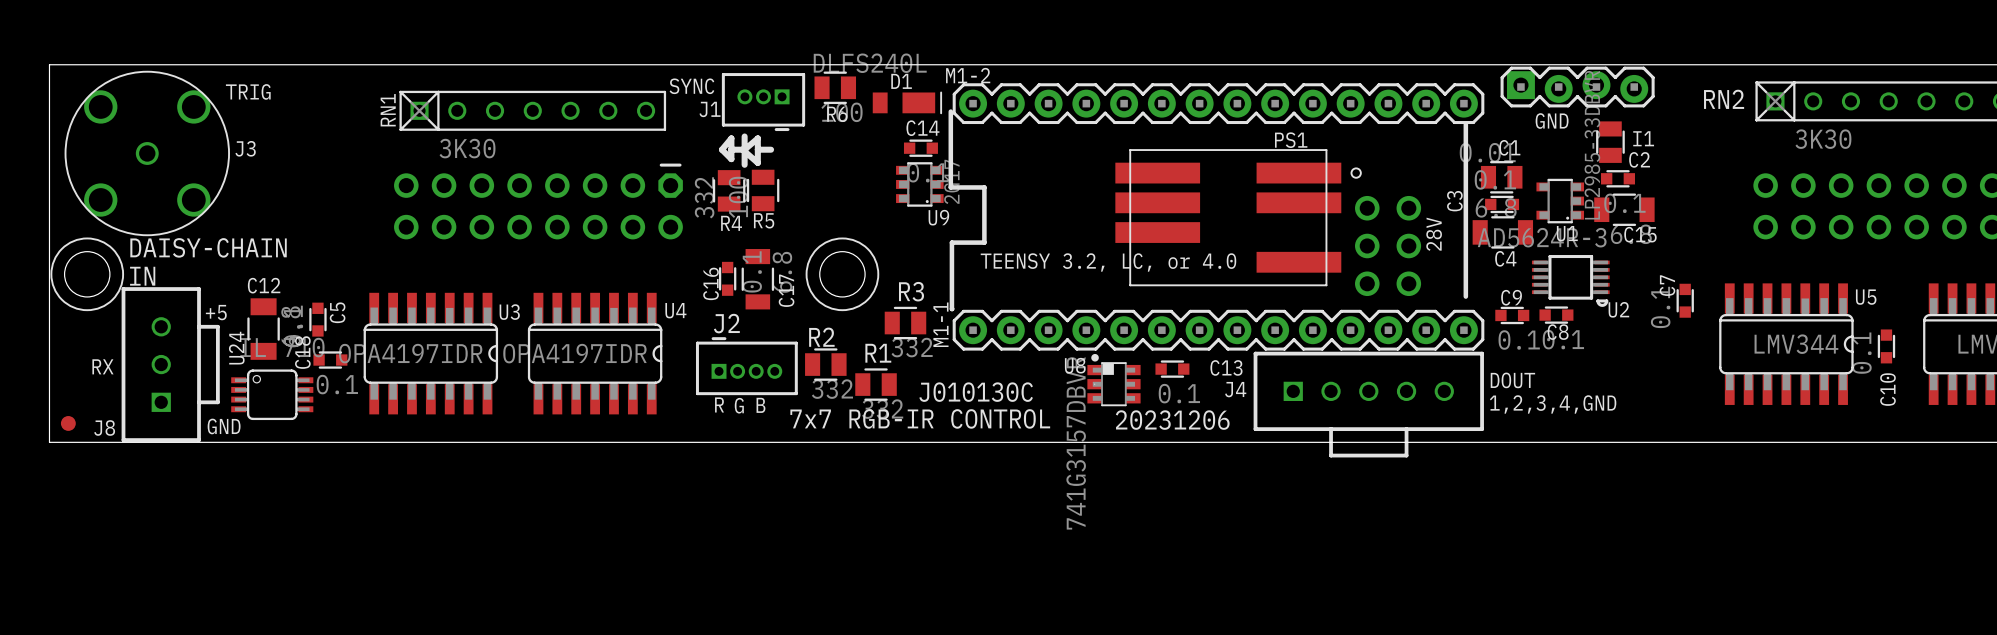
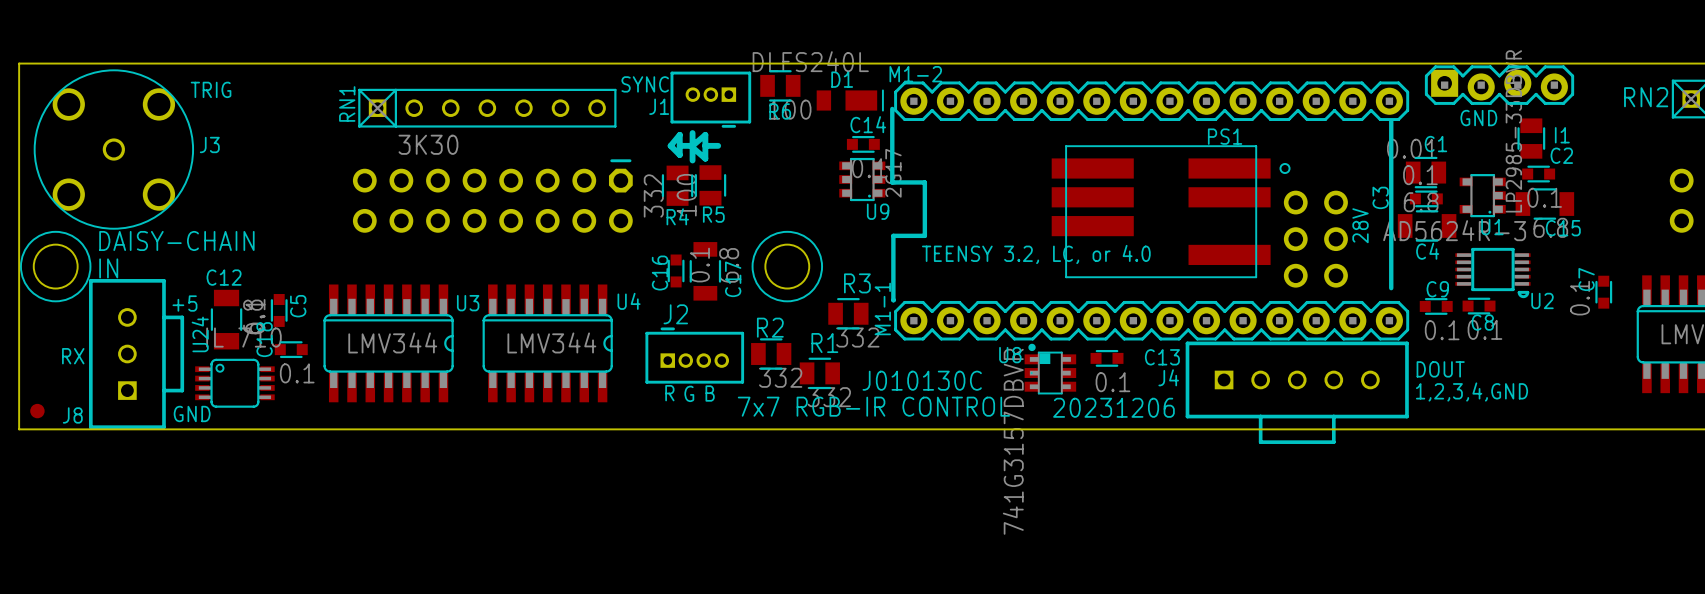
U3 value: OPA4197IDR (410, 353) -> LMV344 (392, 342)
U4 value: OPA4197IDR (574, 353) -> LMV344 (551, 342)

